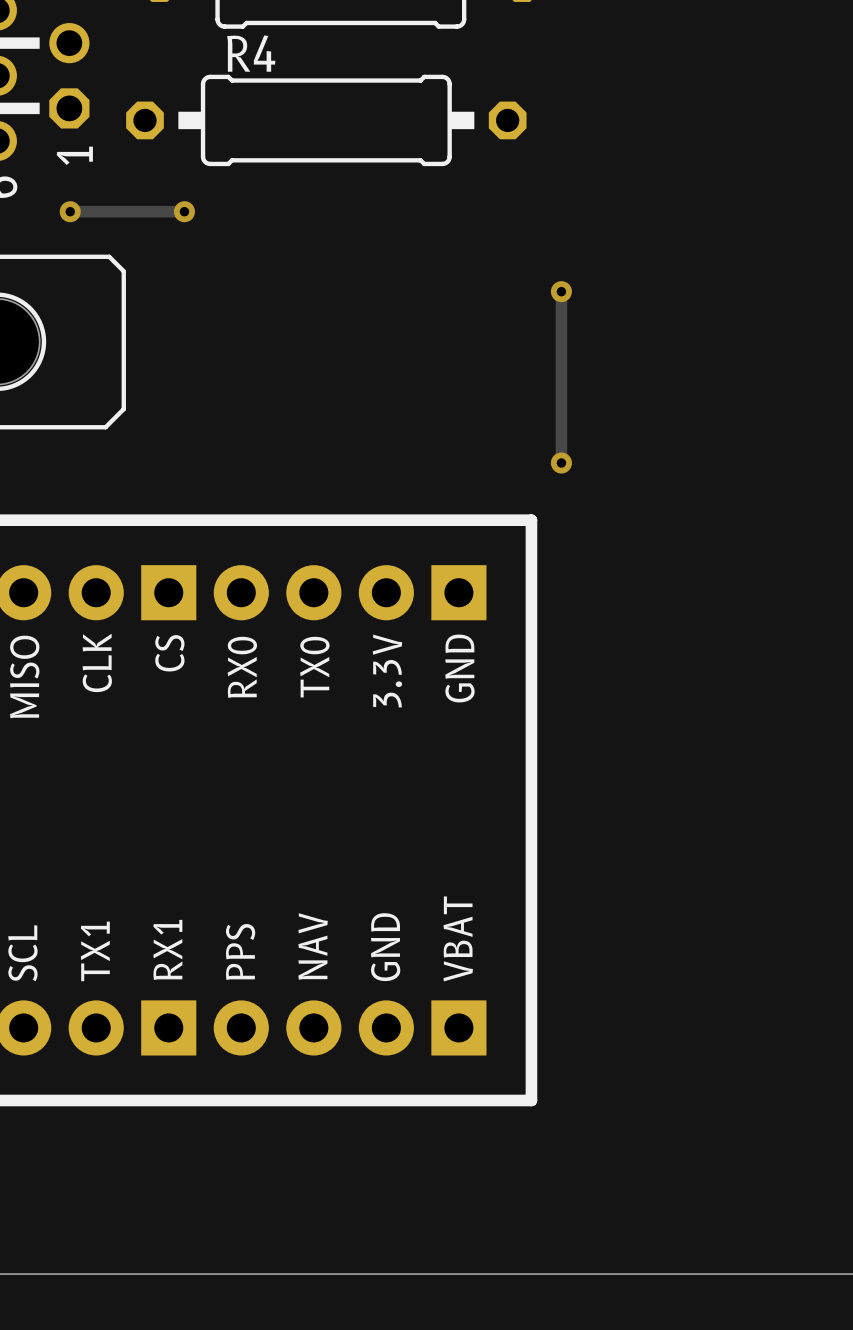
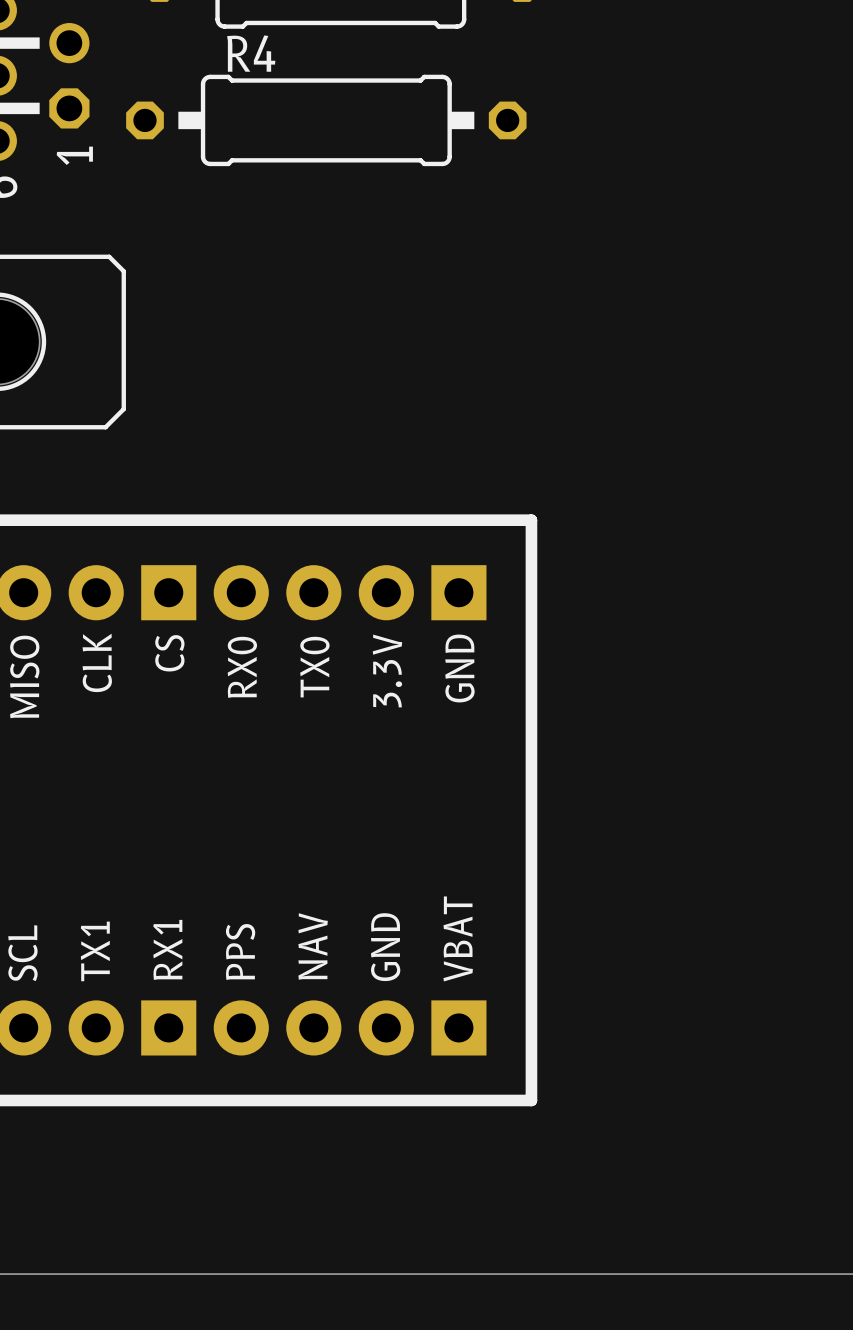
track: (70, 211) (184, 211) -> none
via: (70, 211) -> none
via: (184, 211) -> none
track: (561, 291) (561, 463) -> none
via: (561, 291) -> none
via: (561, 463) -> none

